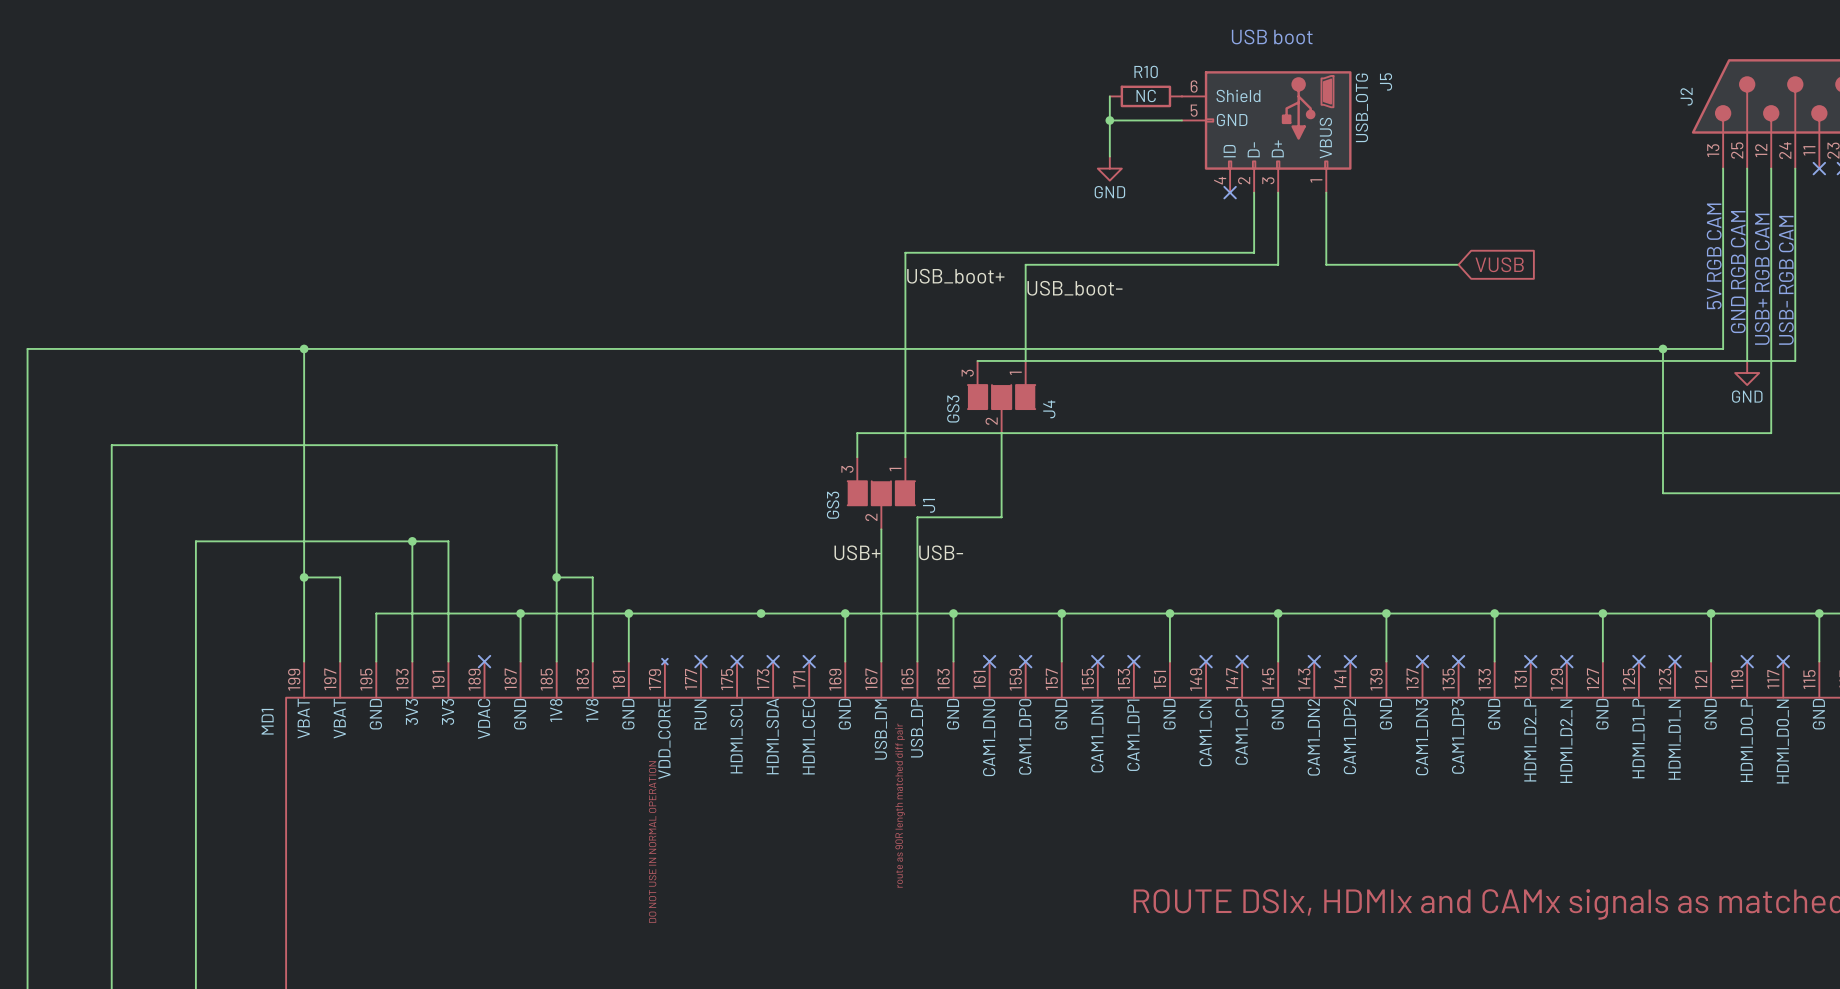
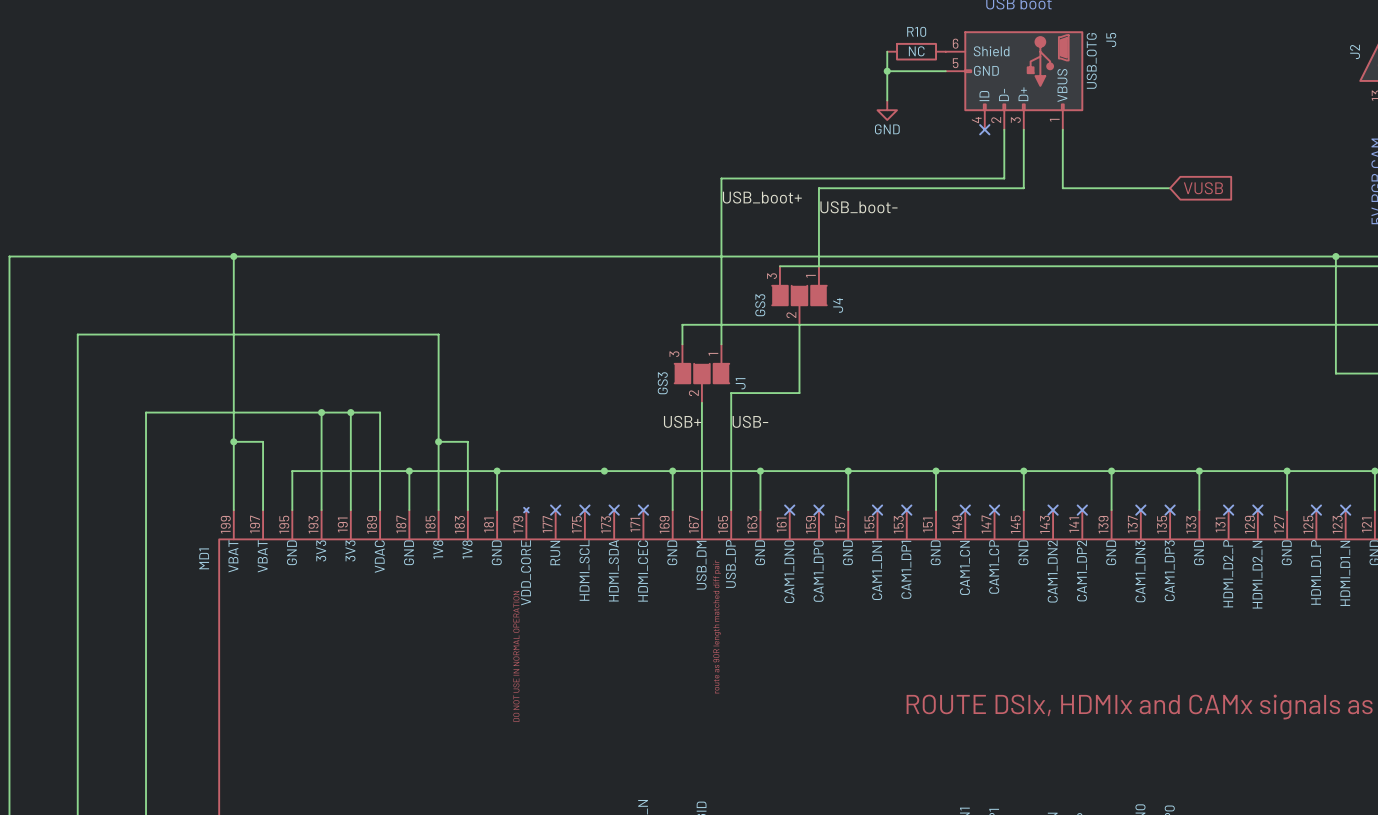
wire: none -> (350, 412) (380, 412) (380, 510)
junction: none -> (350, 412)
no-connect mark: (484, 661) -> none

